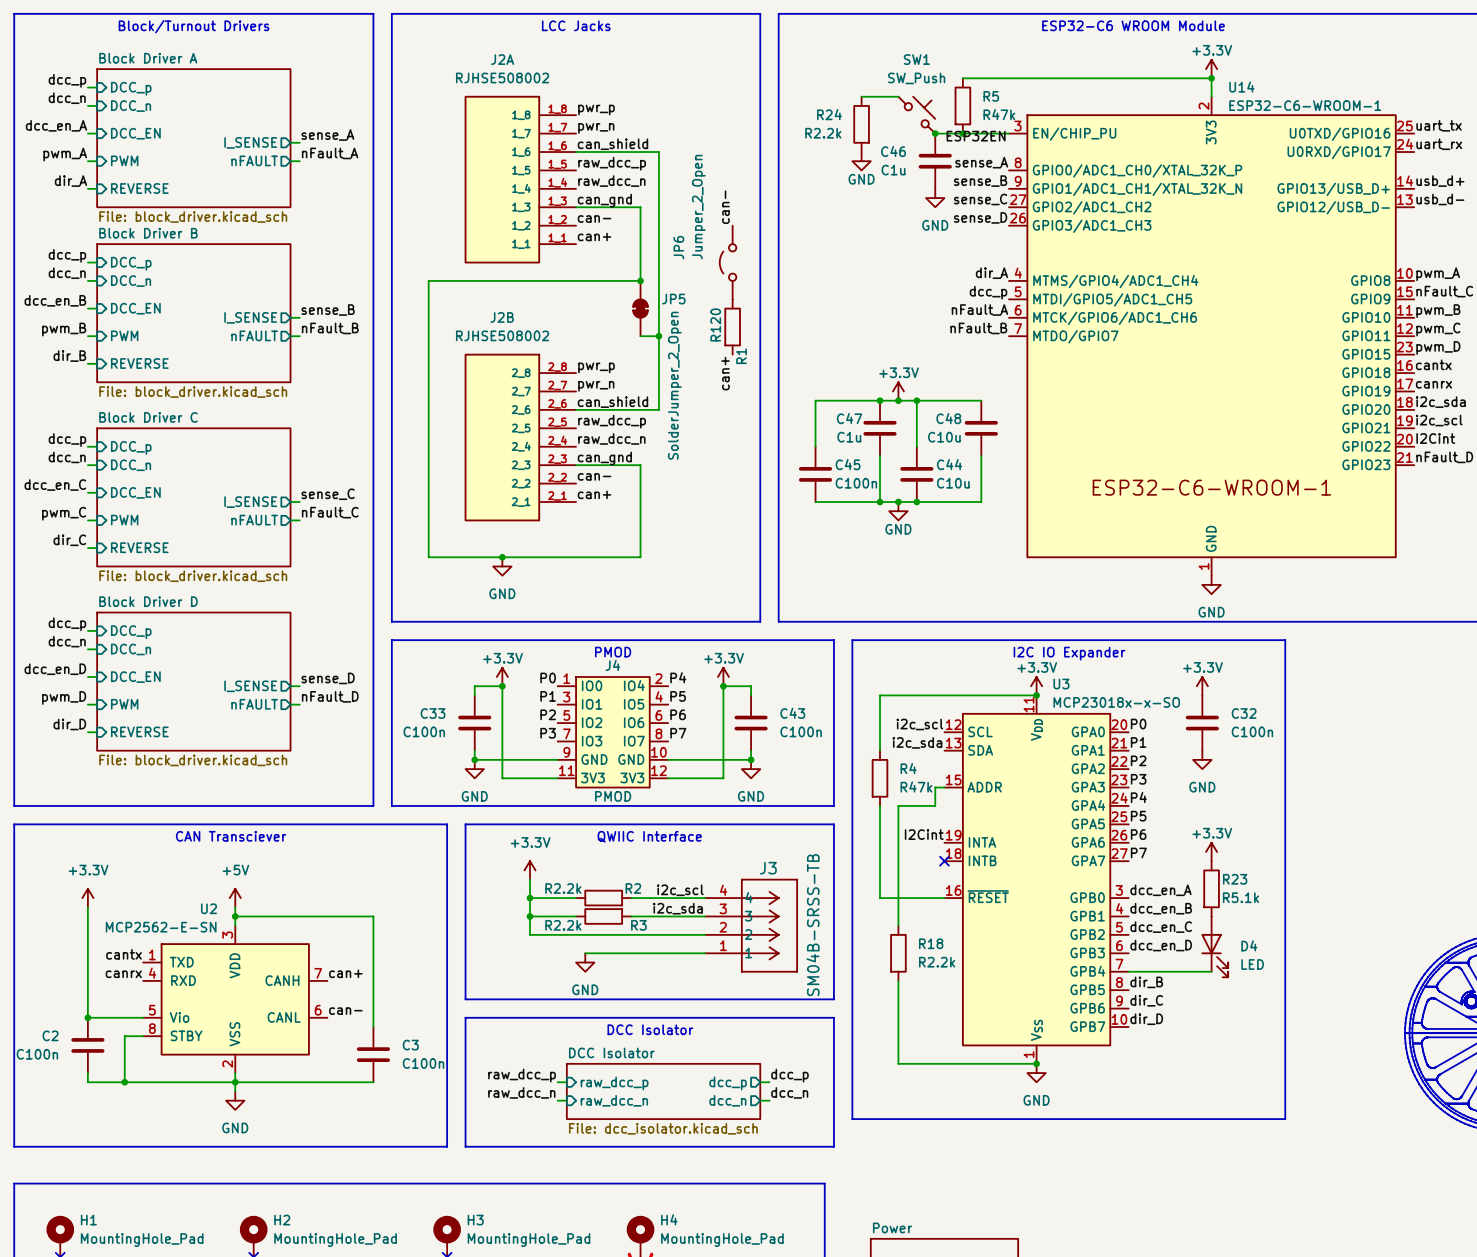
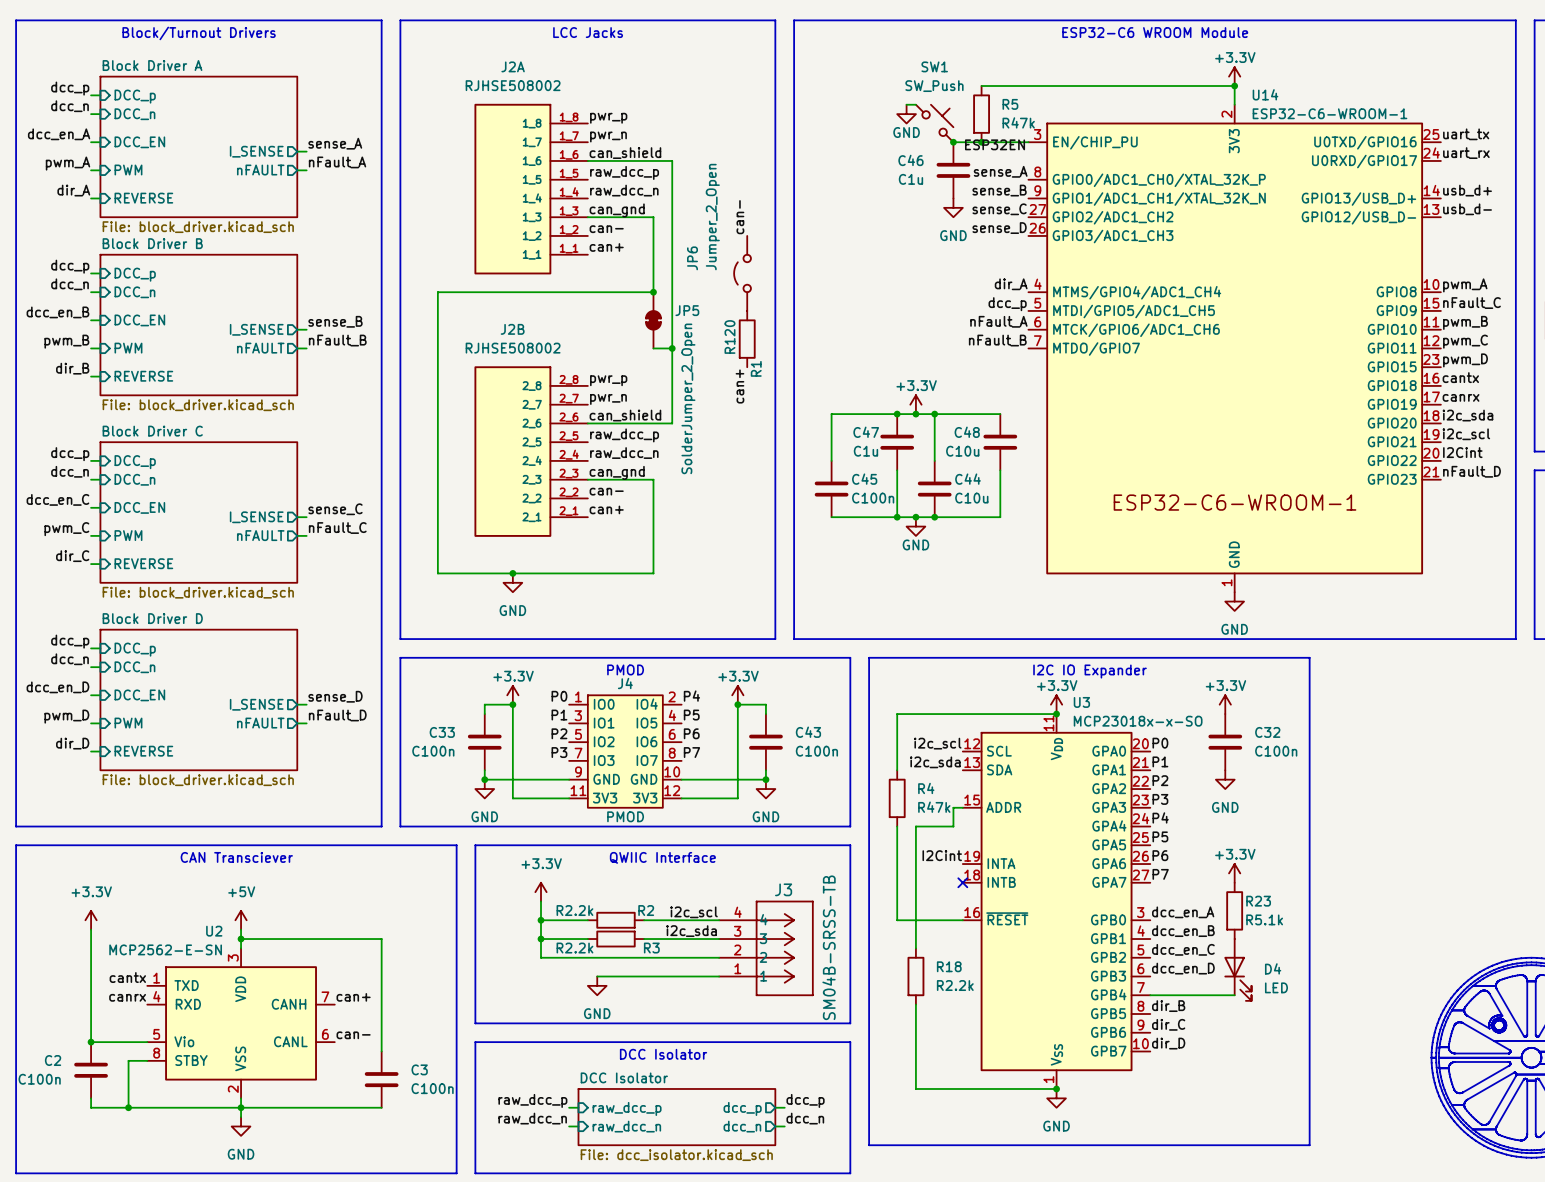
wire: (861, 96) (889, 96) -> none
R24: R2.2k (861, 124) -> none
power symbol position: GND (861, 161) -> GND (906, 114)

